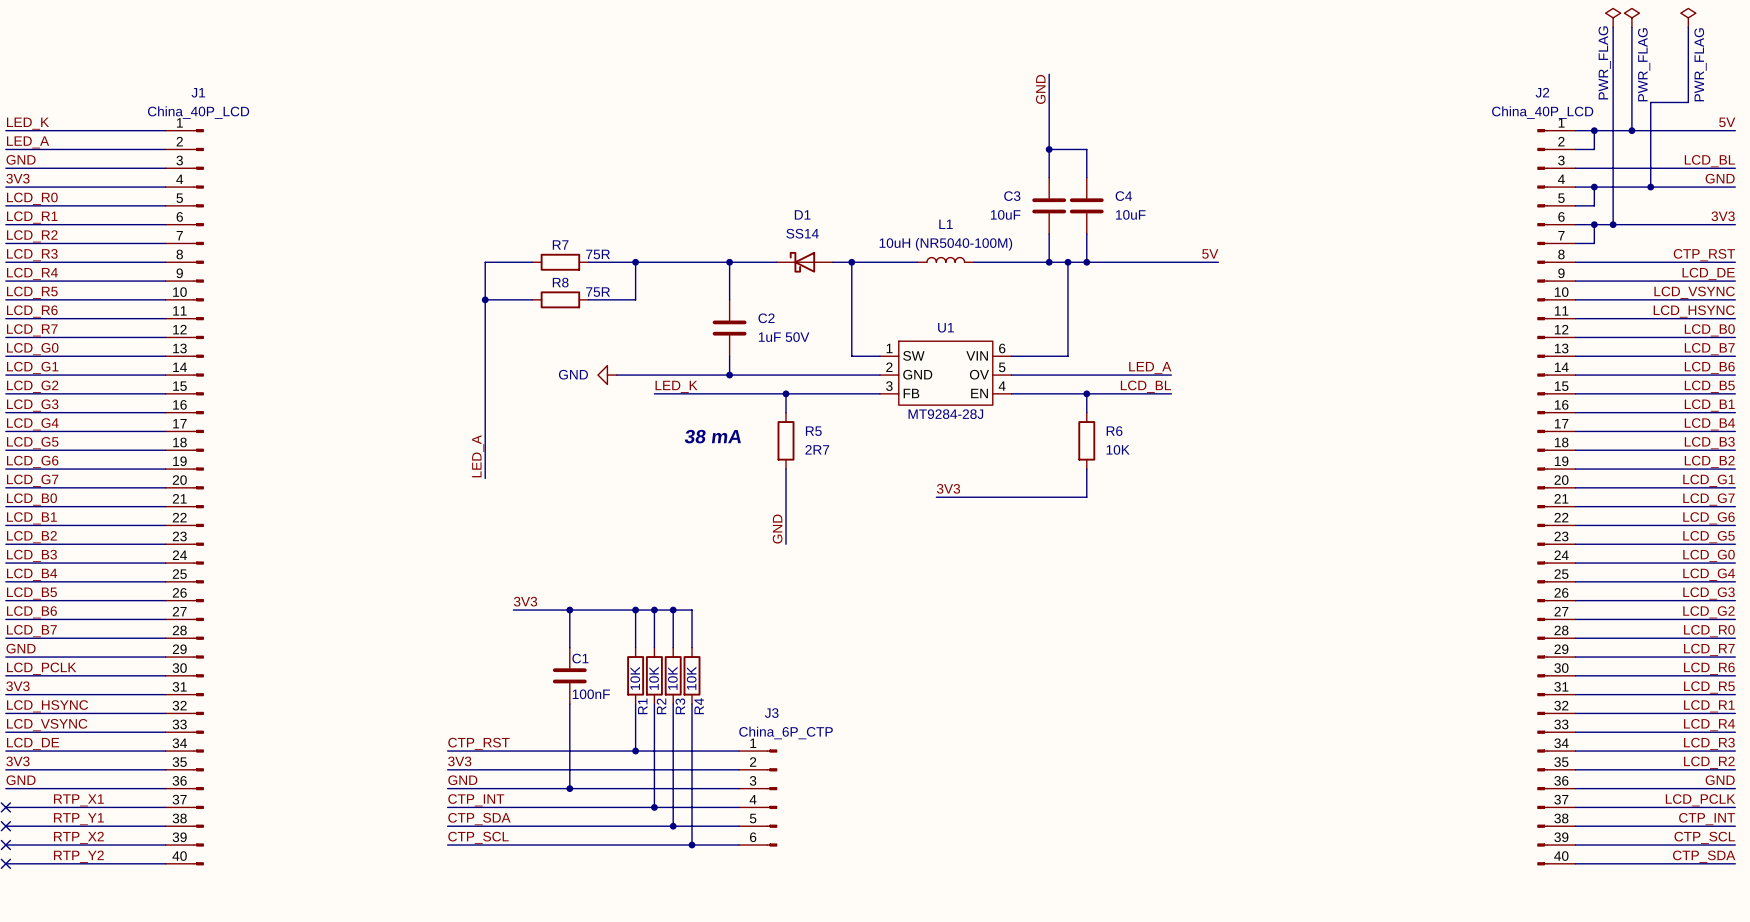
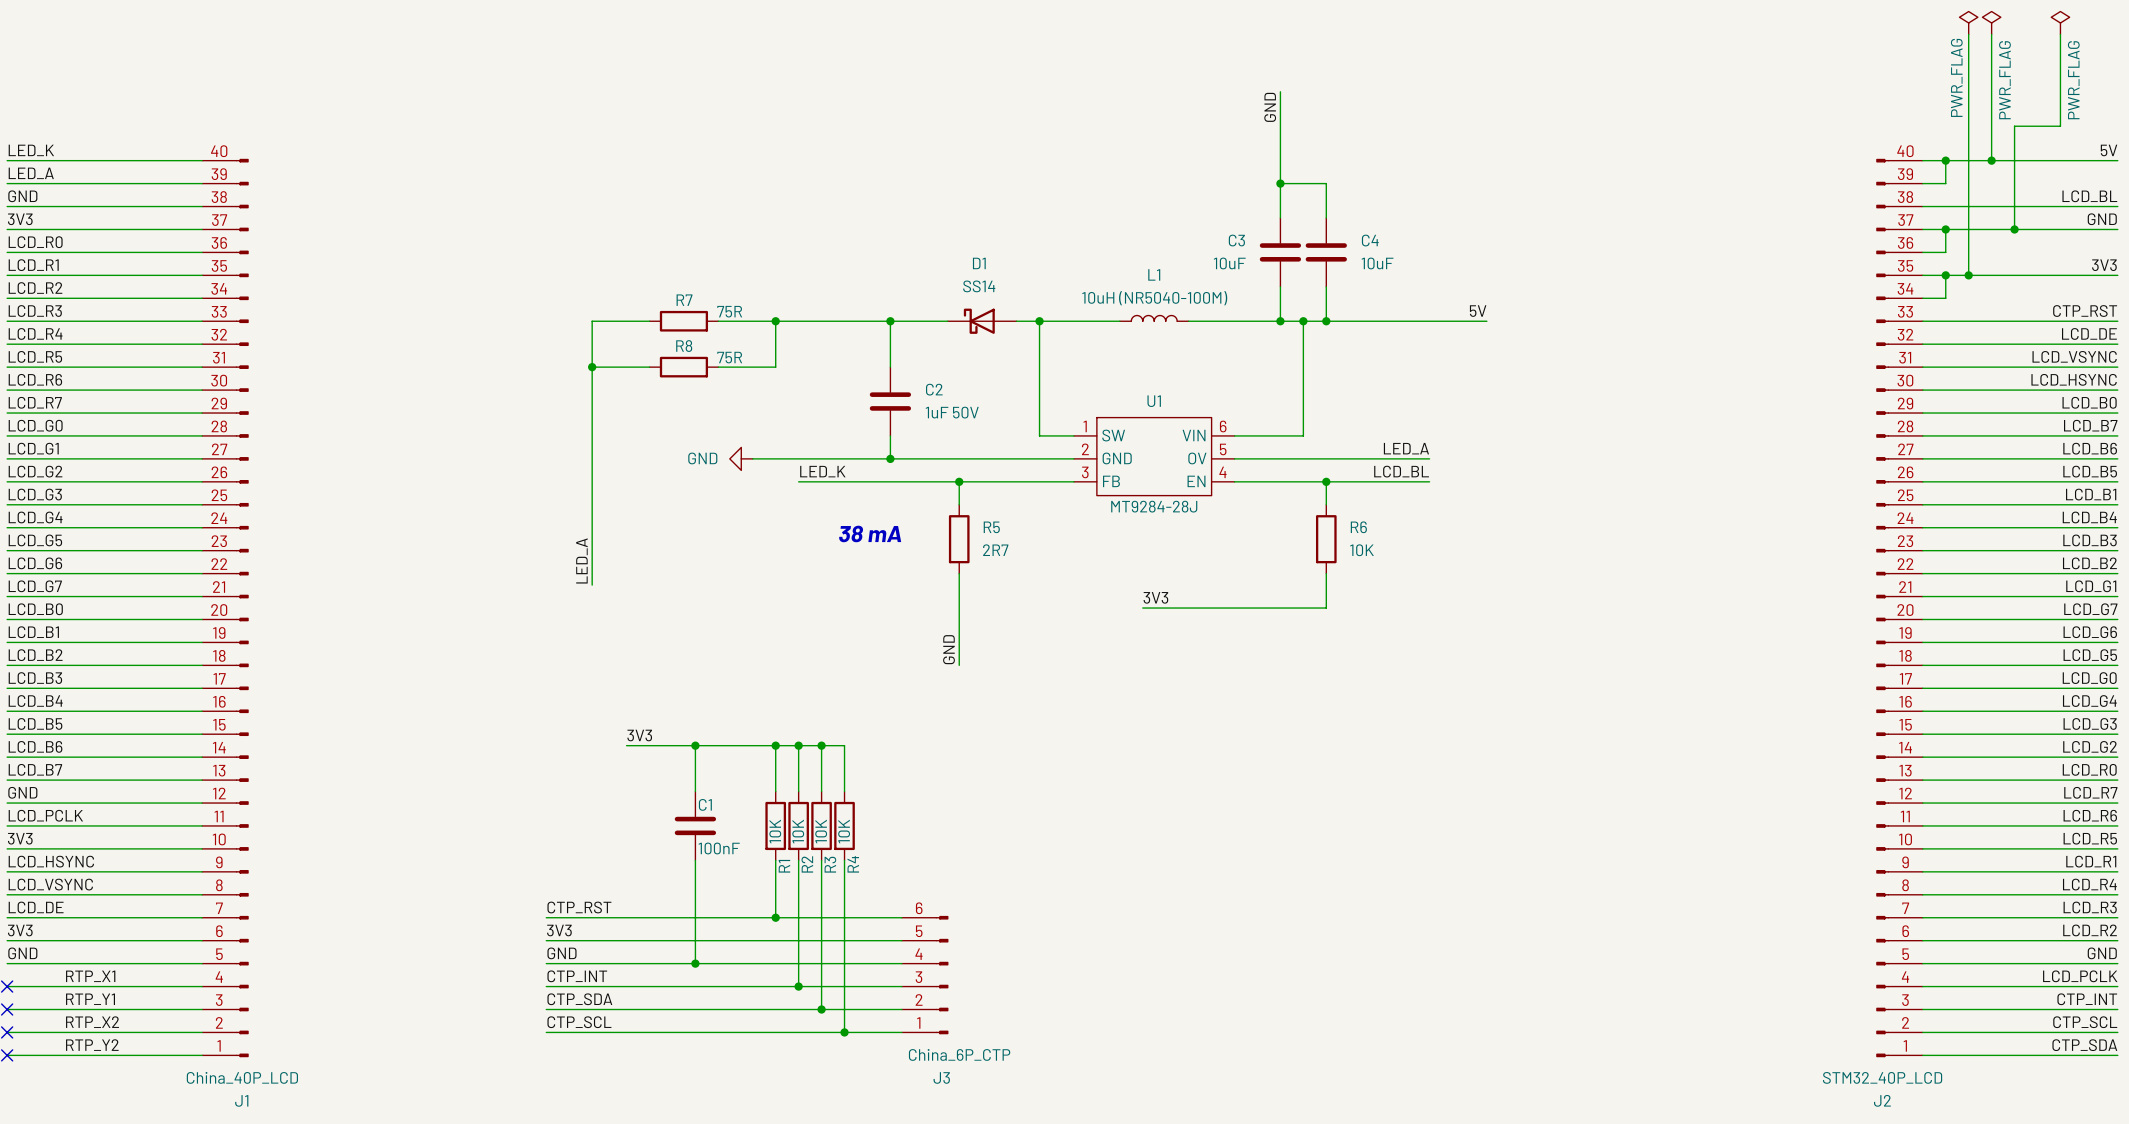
J2 value: China_40P_LCD (1542, 112) -> STM32_40P_LCD (1882, 1077)
J1 flip: as is (198, 497) -> up-down (242, 608)
J2 flip: as is (1542, 497) -> up-down (1882, 608)
J3 flip: as is (771, 798) -> up-down (942, 975)

